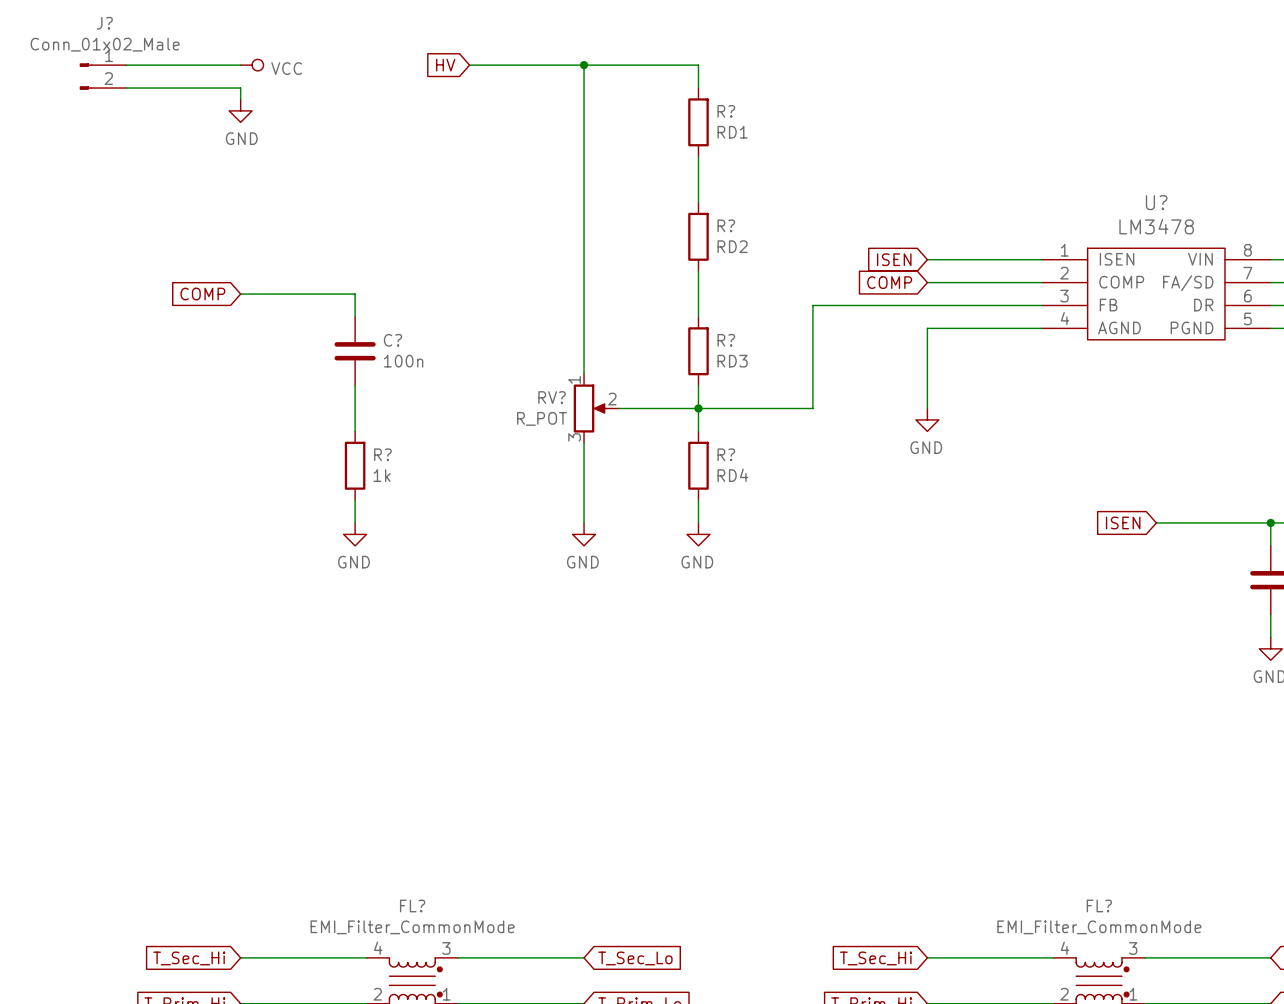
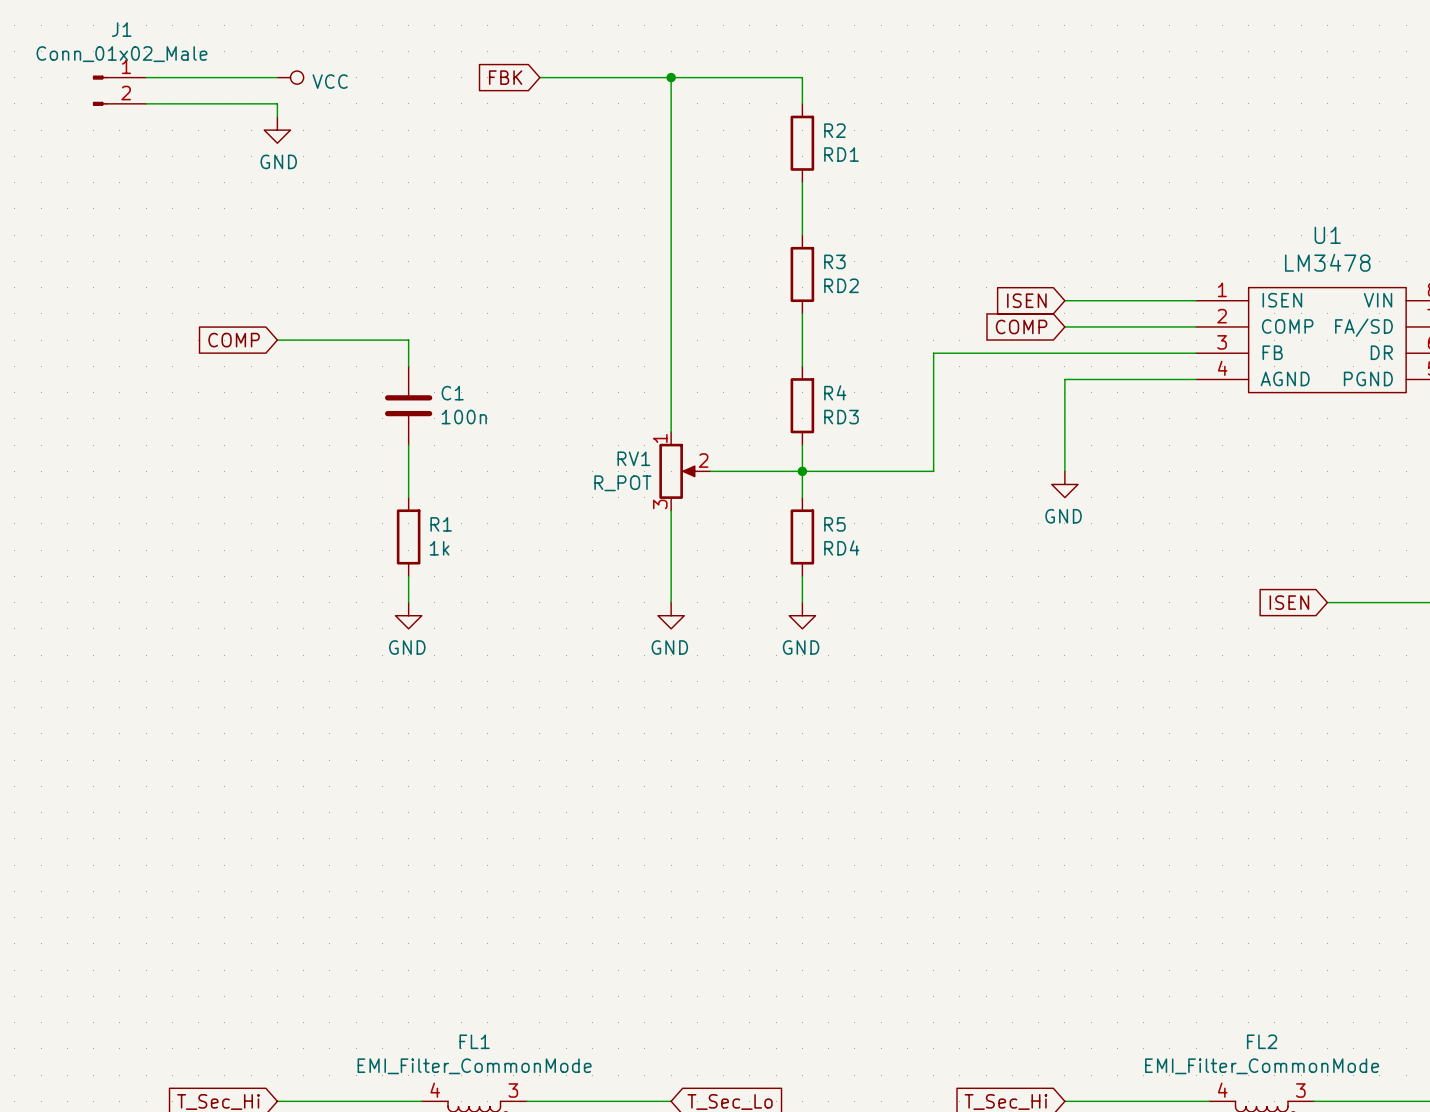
J? name: J? (104, 23) -> J1 (121, 29)
global label: HV (445, 65) -> FBK (505, 77)
R? name: R? (726, 111) -> R2 (834, 130)
U? name: U? (1156, 202) -> U1 (1327, 235)
R? name: R? (726, 225) -> R3 (834, 261)
C? name: C? (392, 340) -> C1 (452, 393)
R? name: R? (726, 340) -> R4 (835, 392)
RV? name: RV? (552, 397) -> RV1 (633, 458)
R? name: R? (382, 454) -> R1 (441, 524)
R? name: R? (726, 454) -> R5 (834, 524)
FL? name: FL? (412, 905) -> FL1 (474, 1041)
FL? name: FL? (1099, 905) -> FL2 (1262, 1041)

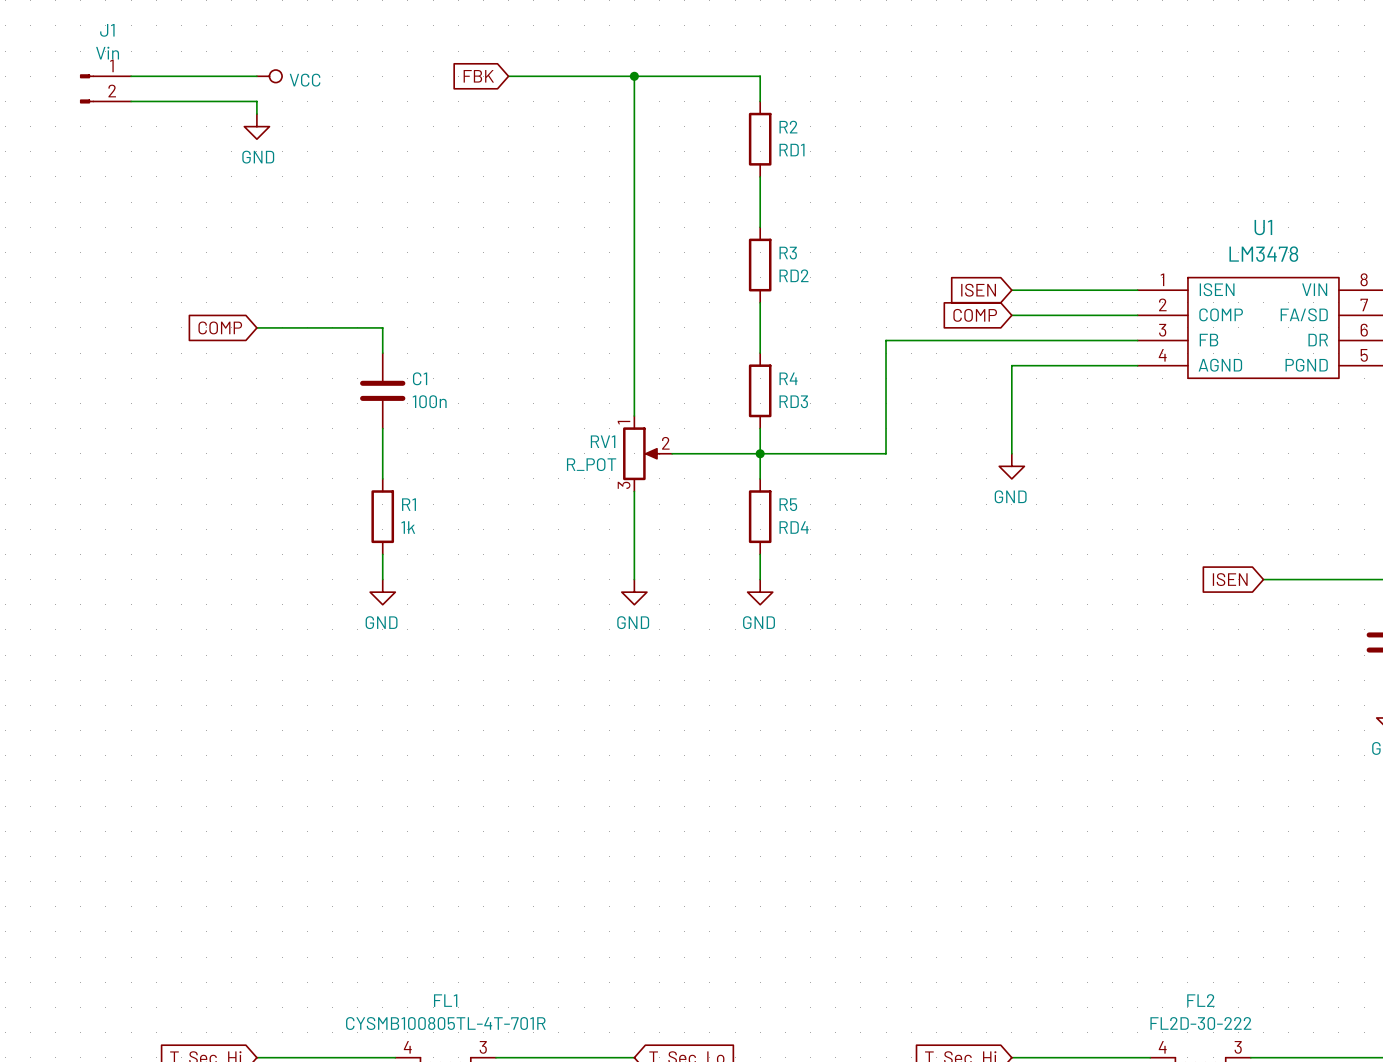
J1 value: Conn_01x02_Male (121, 54) -> Vin (107, 53)
FL1 value: EMI_Filter_CommonMode (474, 1066) -> CYSMB100805TL-4T-701R (445, 1023)
FL2 value: EMI_Filter_CommonMode (1262, 1066) -> FL2D-30-222 (1200, 1023)

